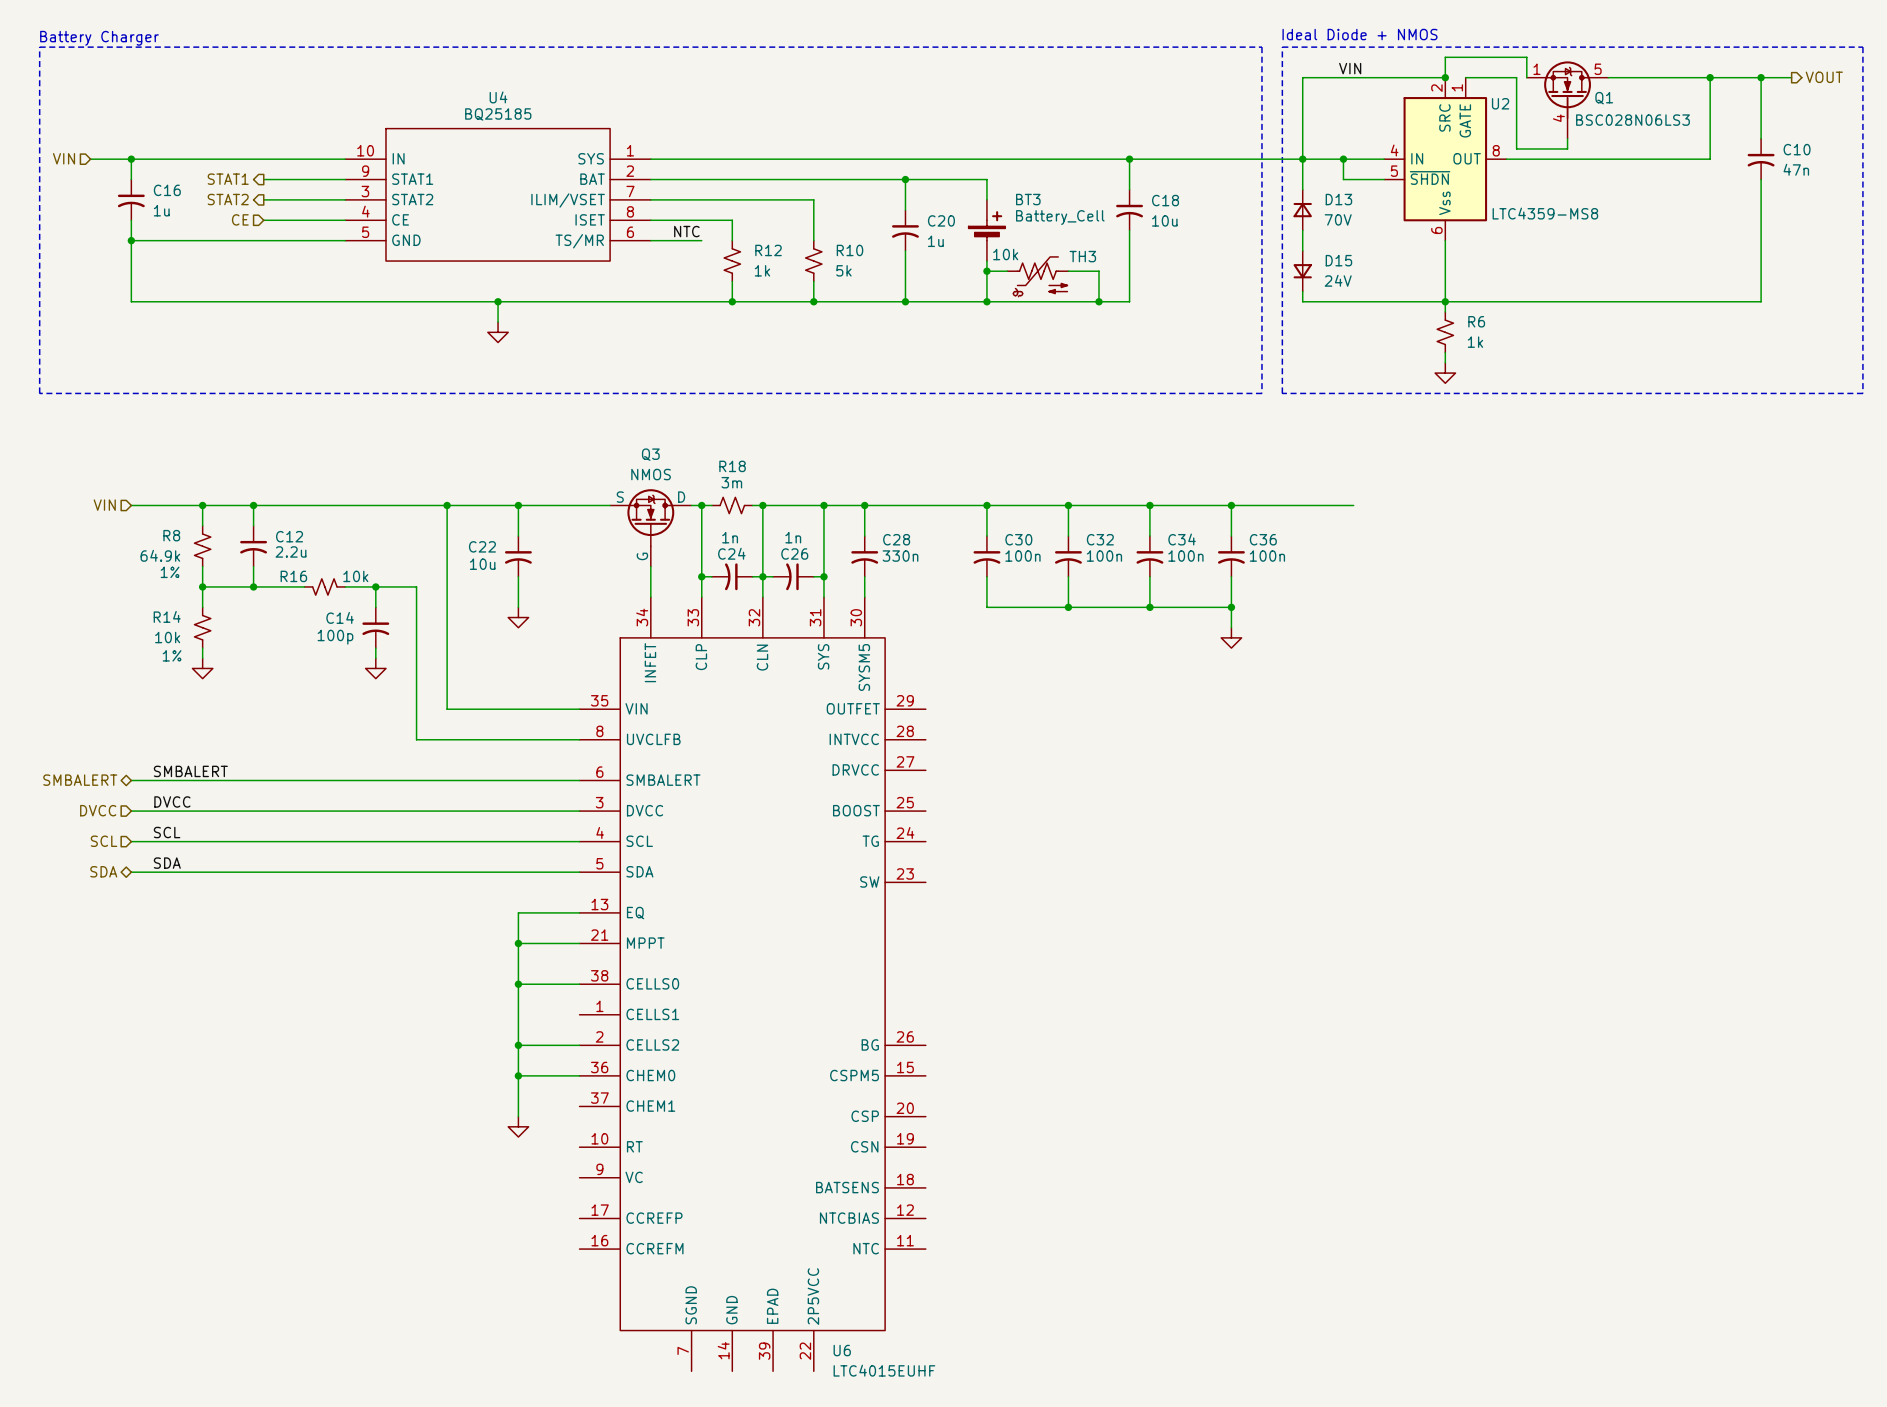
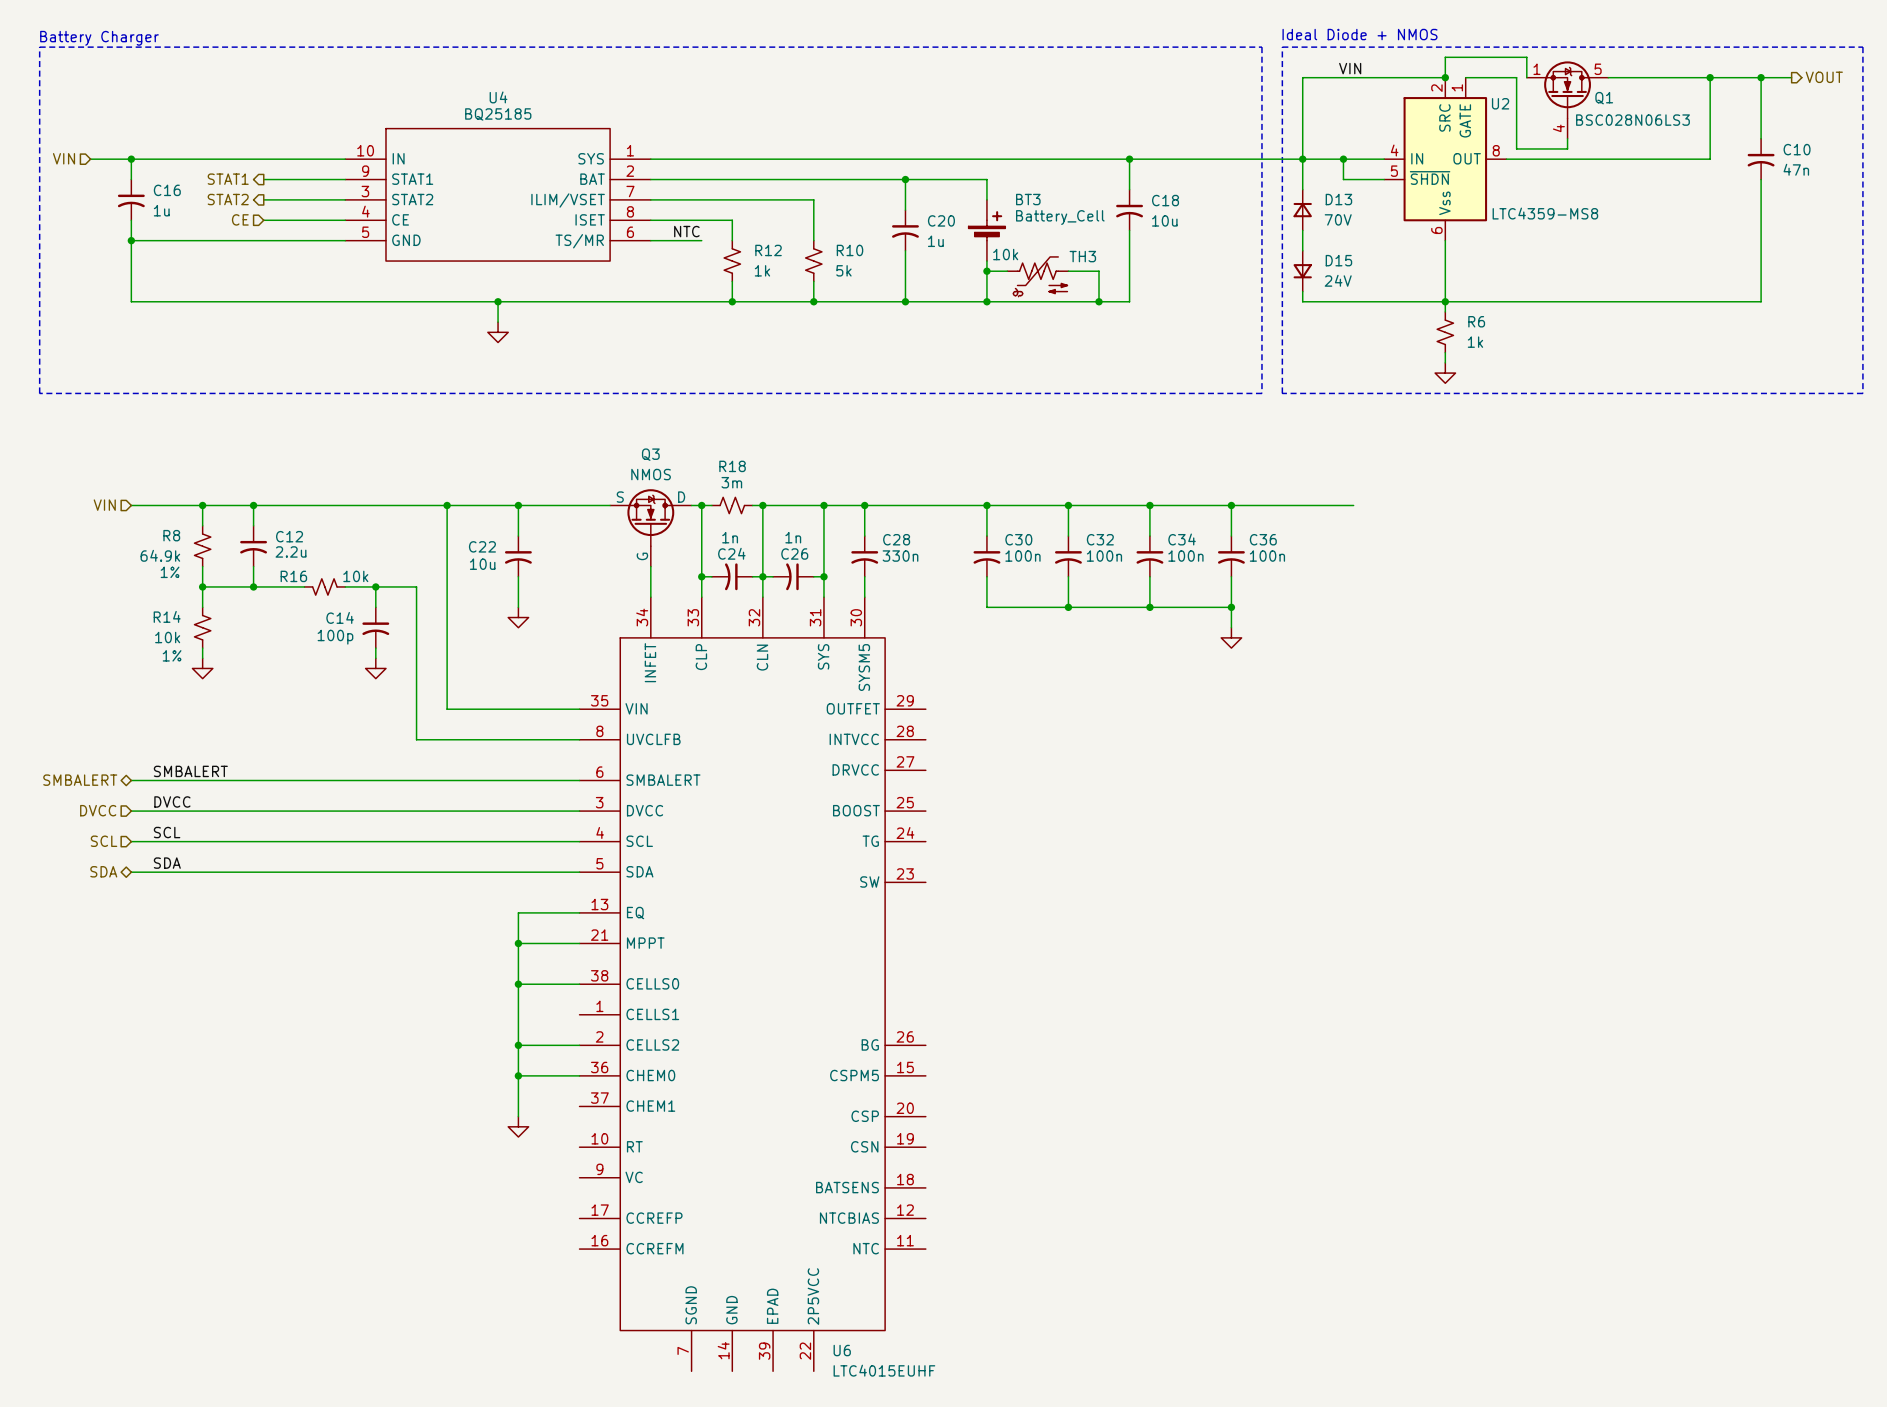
Q1 symbol: [1526, 61, 1609, 139] -> [1526, 61, 1609, 139]

